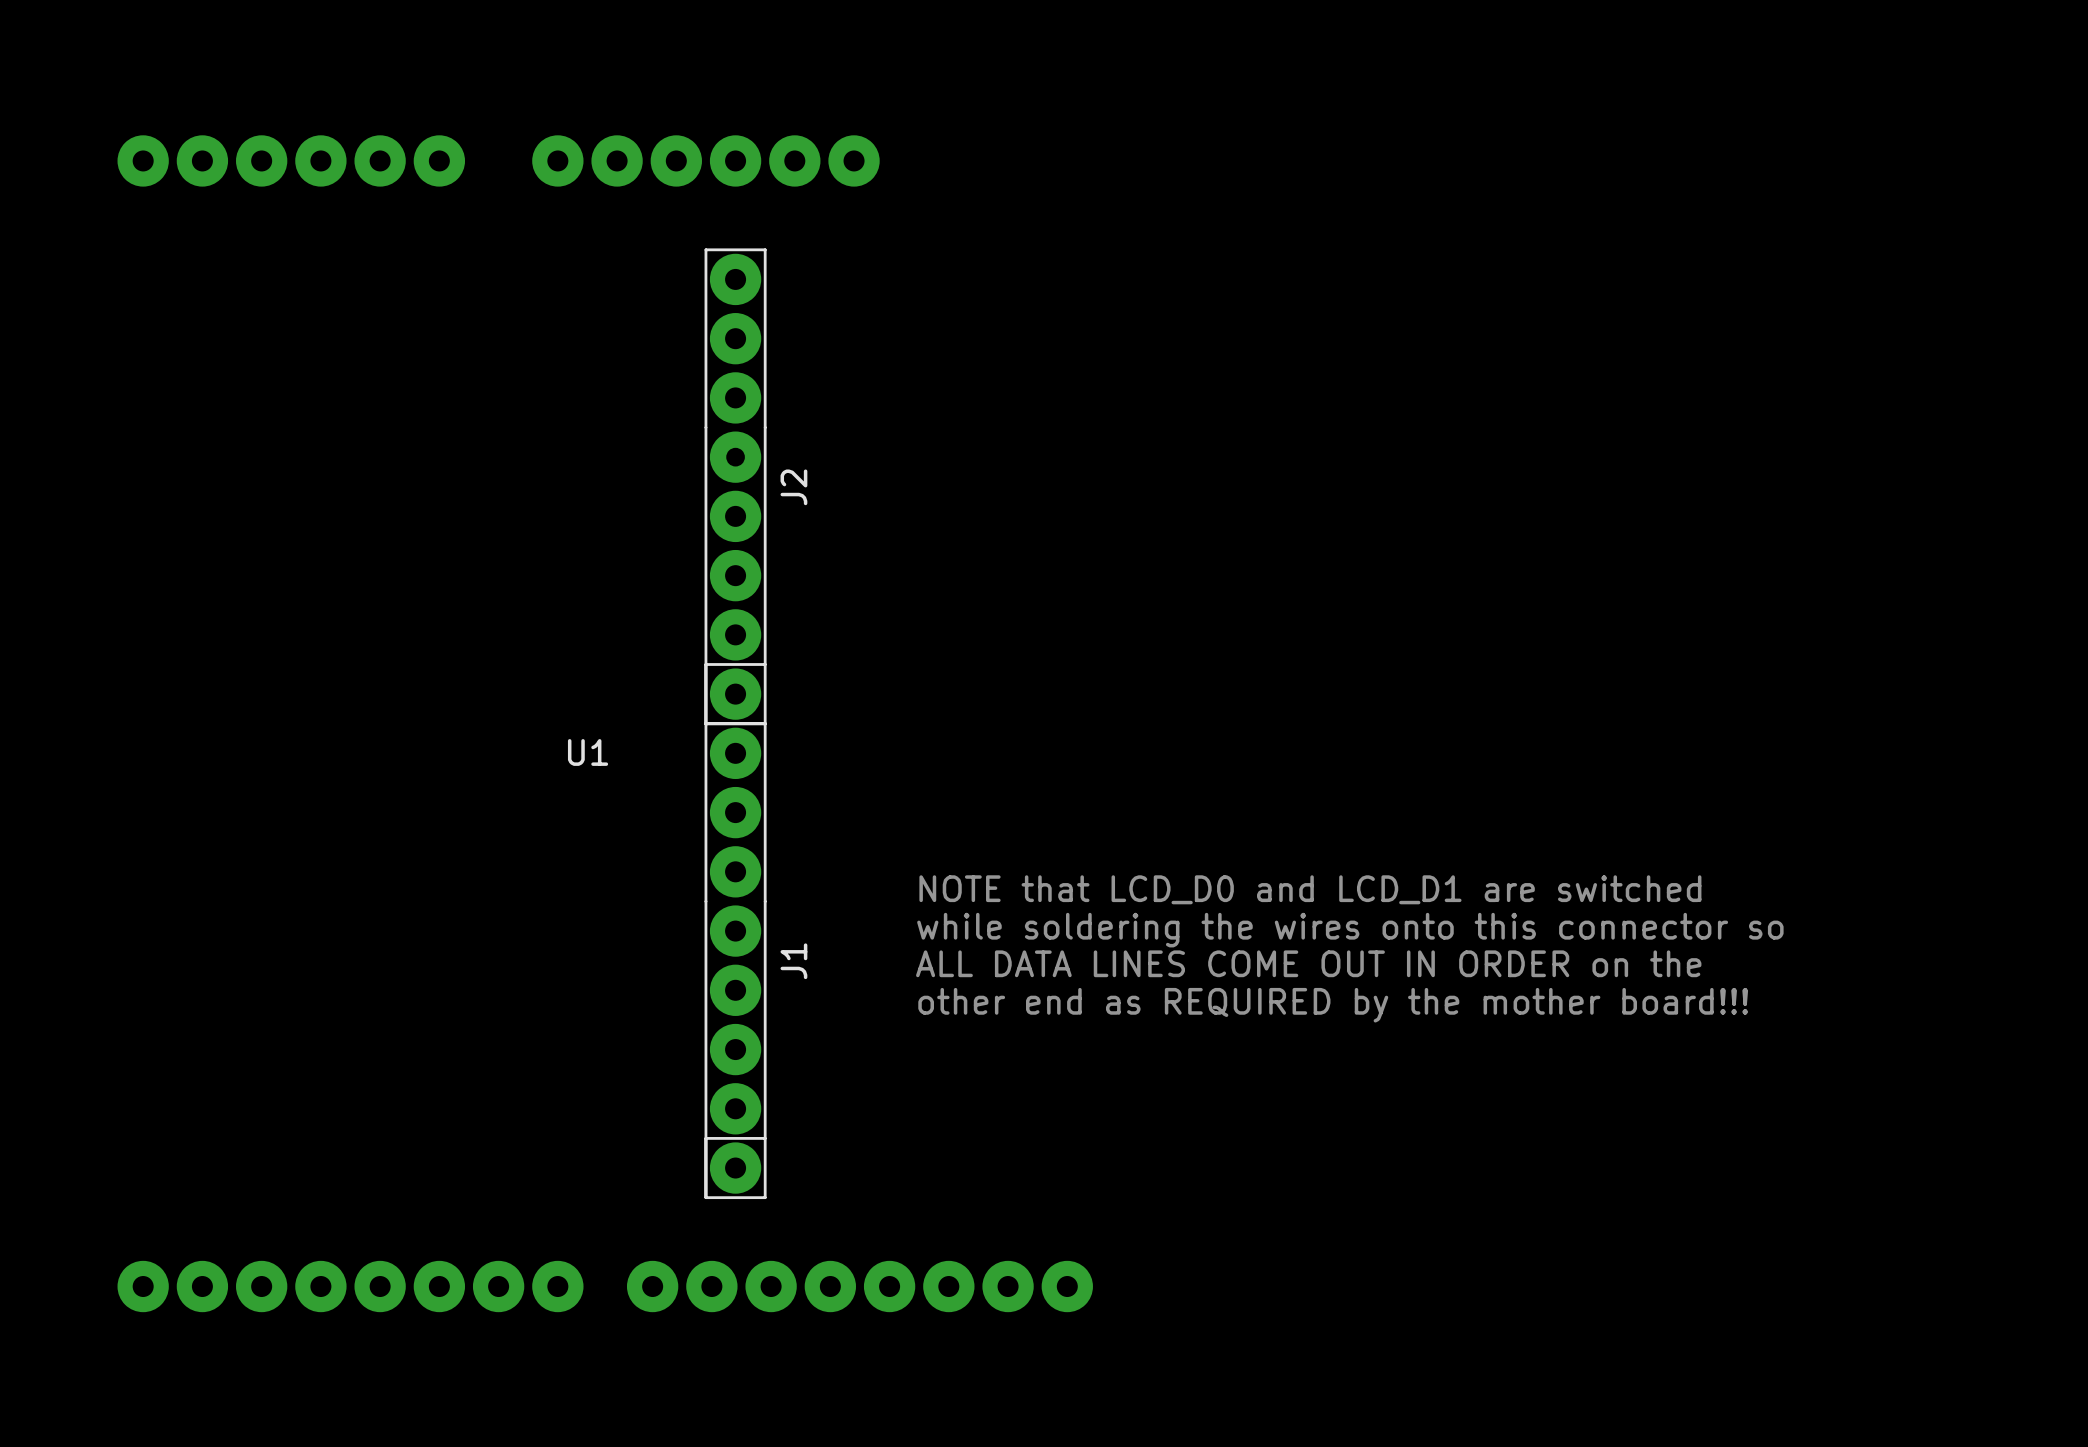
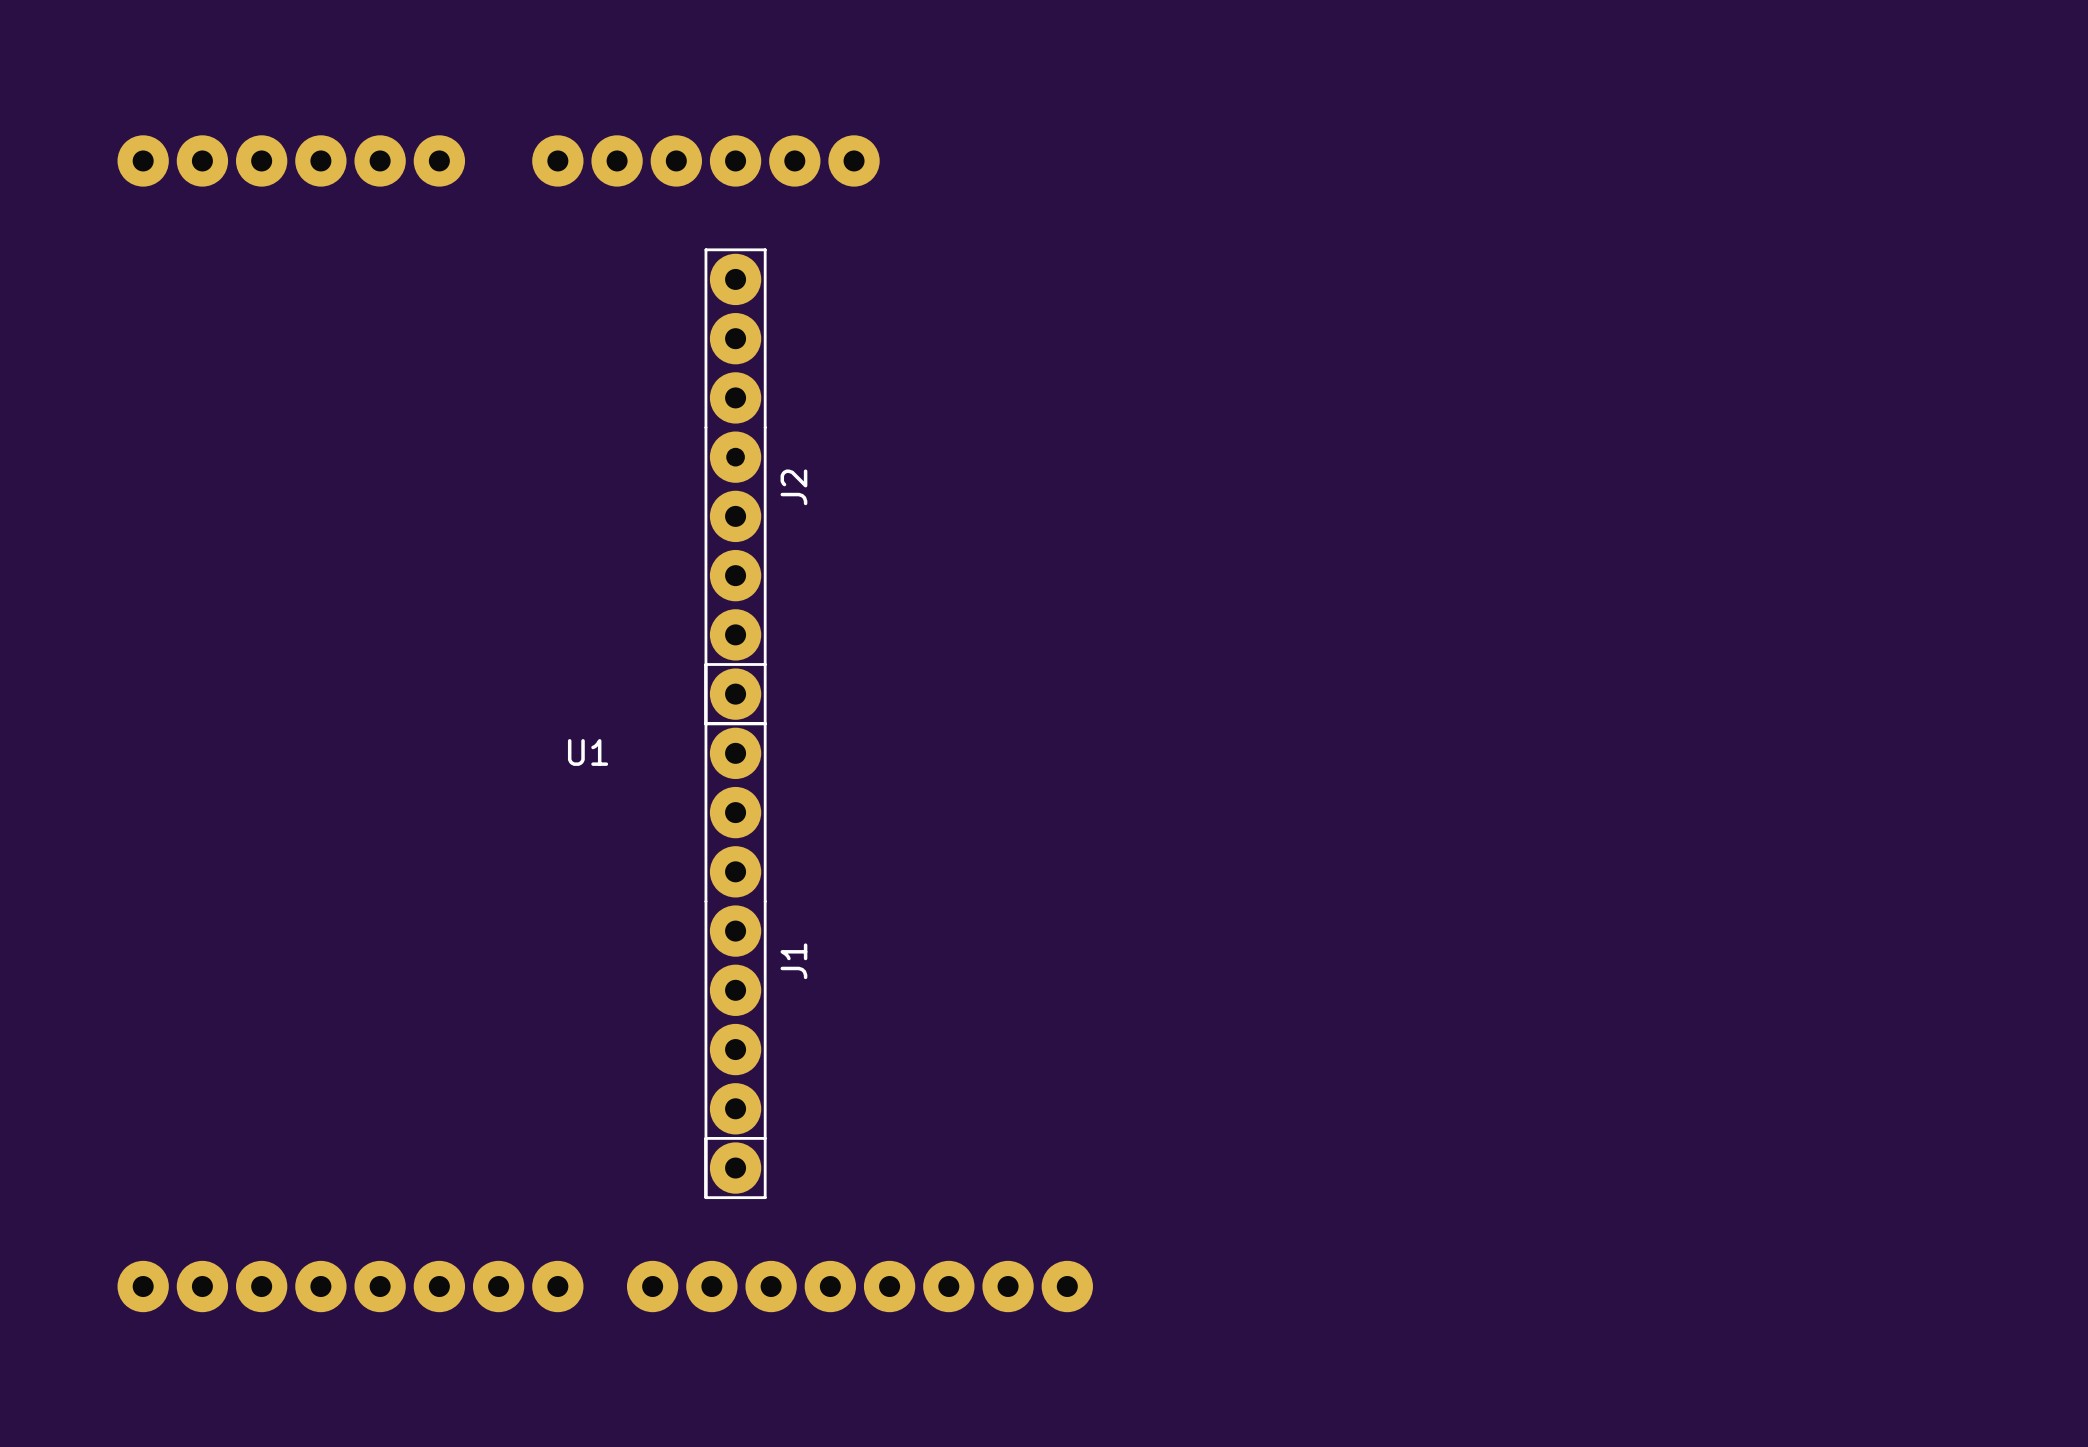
text: NOTE that LCD_D0 and LCD_D1 are switched (1310, 889) -> none
text: while soldering the wires onto this connector so (1350, 930) -> none
text: ALL DATA LINES COME OUT IN ORDER on the (1308, 963) -> none
text: other end as REQUIRED by the mother board!!! (1333, 1005) -> none

